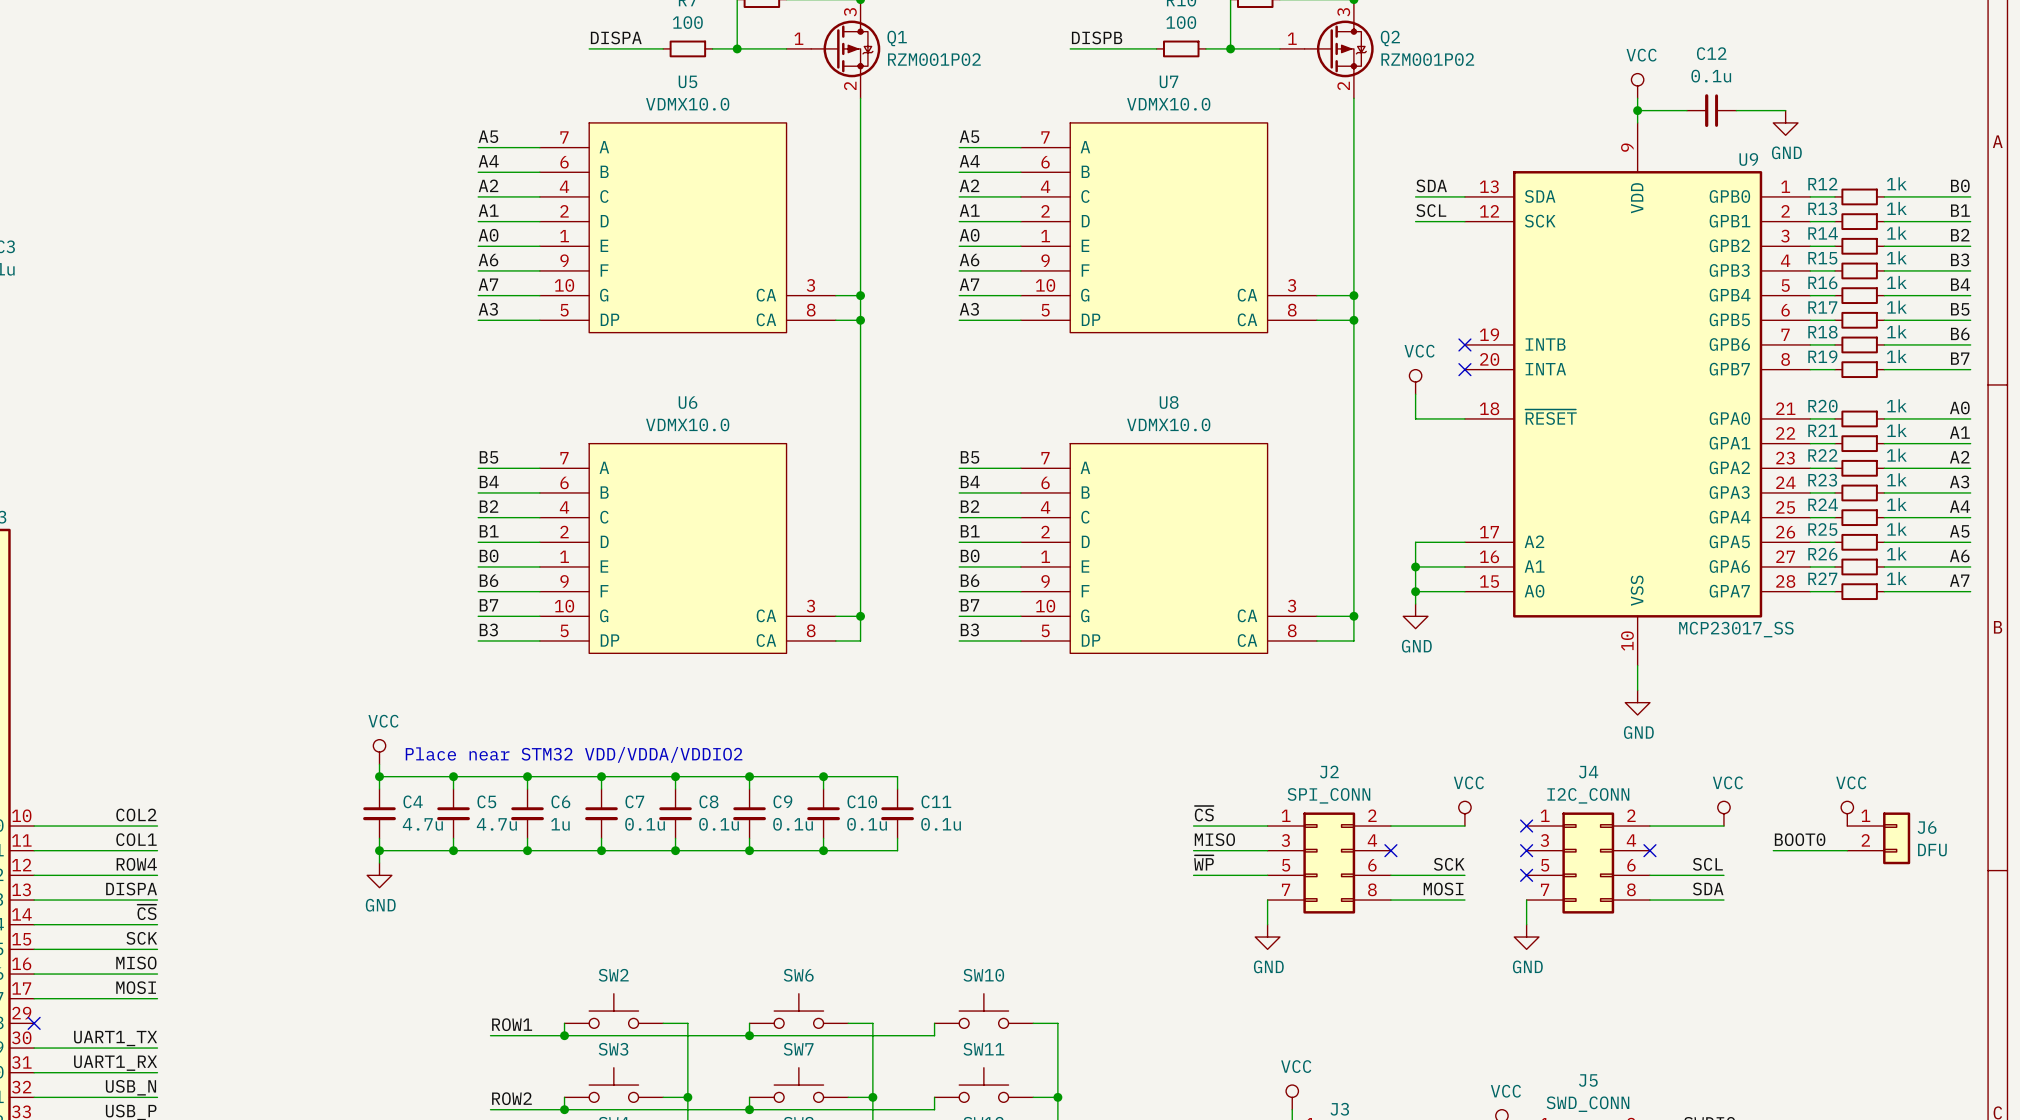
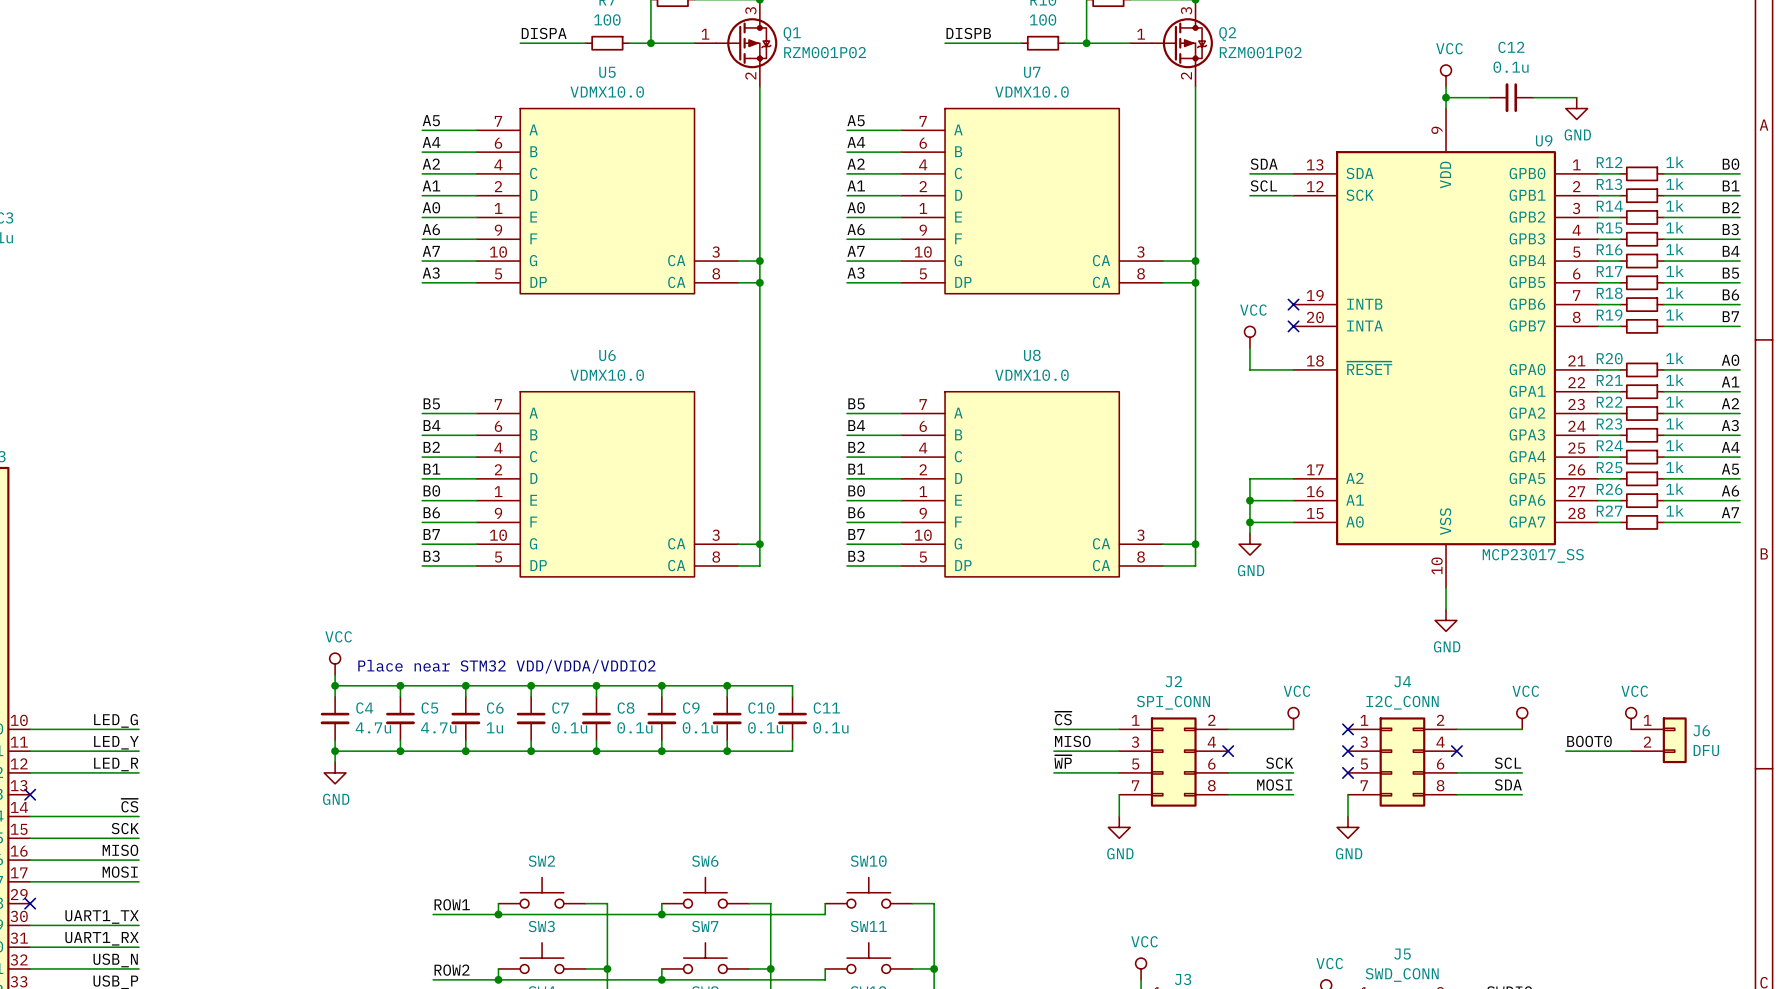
label: COL2 (136, 815) -> LED_G (115, 720)
label: COL1 (136, 839) -> LED_Y (116, 742)
label: ROW4 (136, 864) -> LED_R (116, 764)
label: DISPA (131, 889) -> none
wire: (34, 900) (157, 900) -> none
no-connect mark: none -> (30, 794)

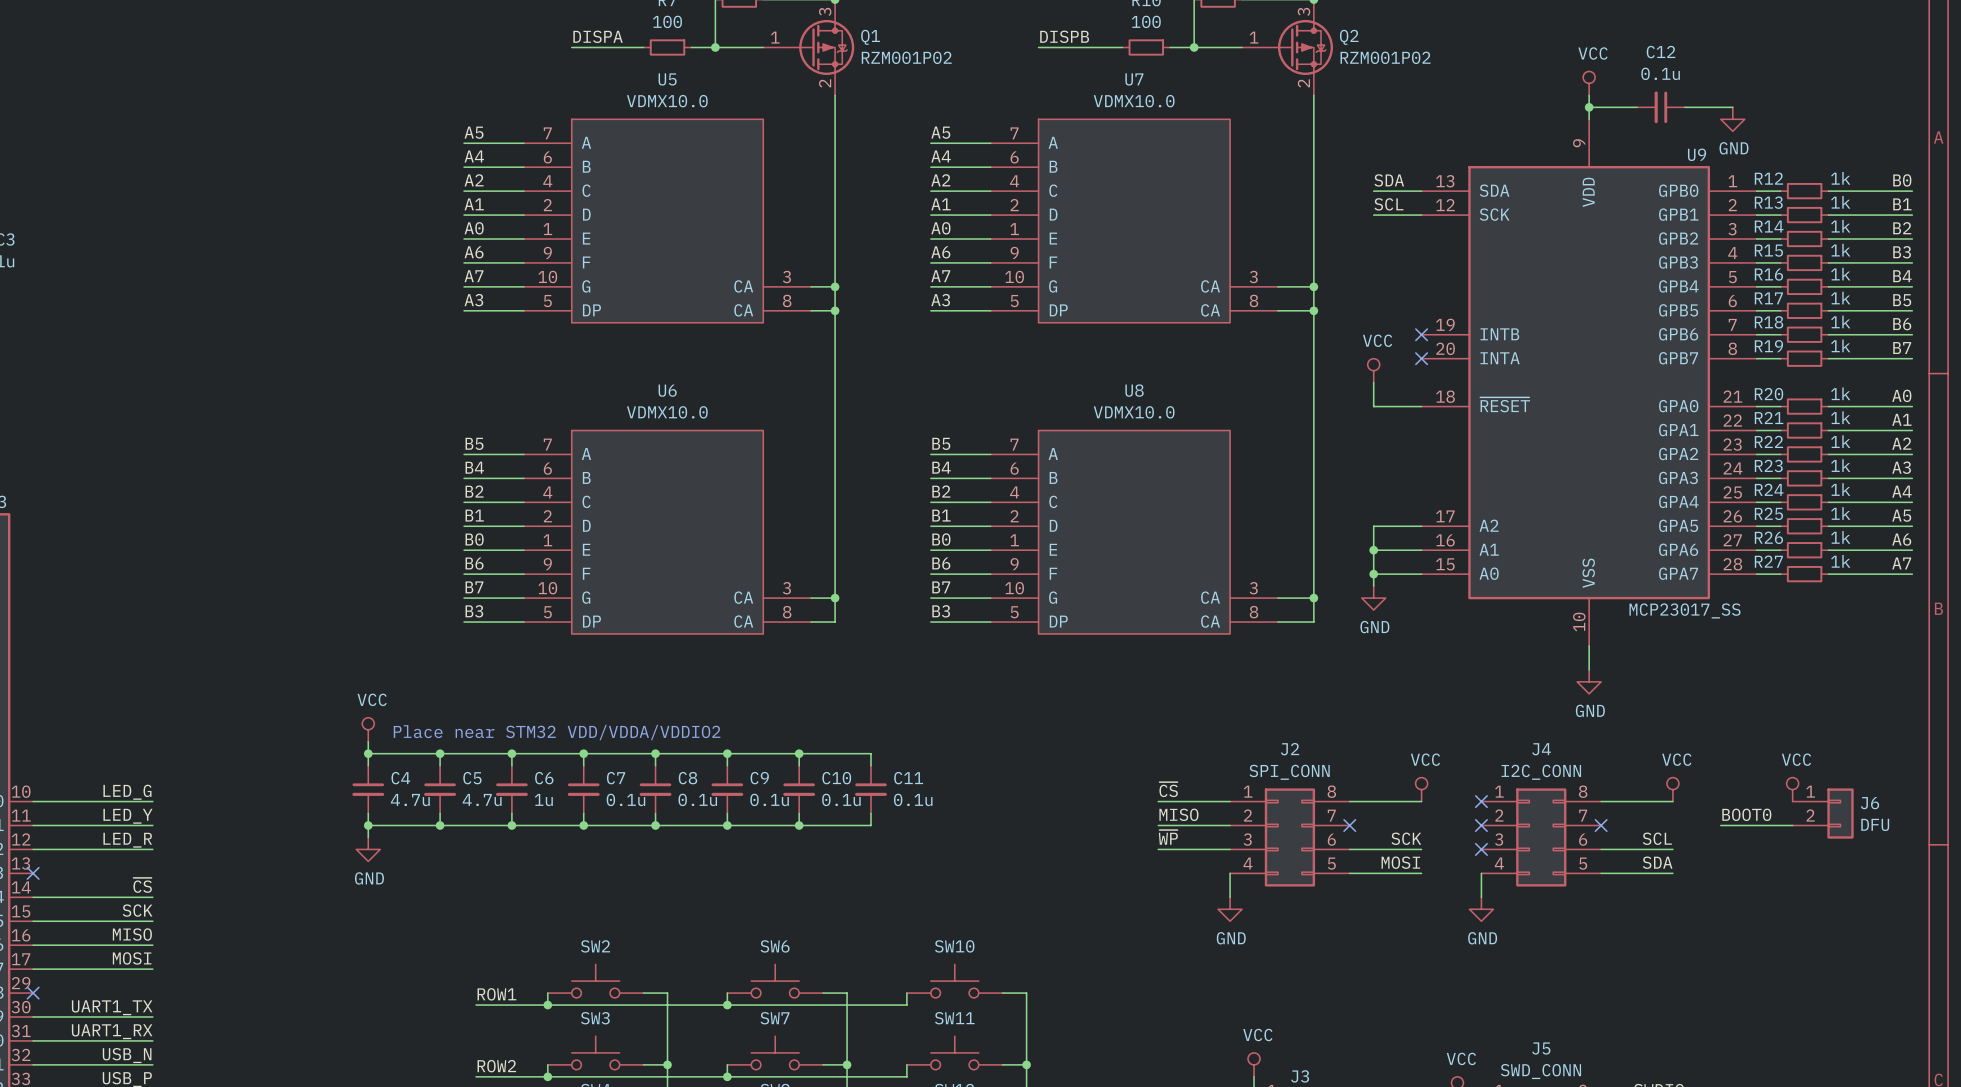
J2 pin number: 2 (1211, 720) -> 8 (1331, 791)
J4 pin number: 2 (1440, 720) -> 8 (1583, 791)
J2 pin number: 3 (1135, 742) -> 2 (1248, 815)
J2 pin number: 4 (1211, 742) -> 7 (1331, 815)
J4 pin number: 3 (1364, 742) -> 2 (1499, 815)
J4 pin number: 4 (1440, 742) -> 7 (1583, 815)
J2 pin number: 5 (1135, 764) -> 3 (1247, 839)
J4 pin number: 5 (1364, 764) -> 3 (1499, 839)
J2 pin number: 7 (1135, 785) -> 4 (1247, 863)
J2 pin number: 8 (1211, 785) -> 5 (1331, 863)
J4 pin number: 7 (1364, 785) -> 4 (1499, 863)
J4 pin number: 8 (1440, 785) -> 5 (1583, 863)

